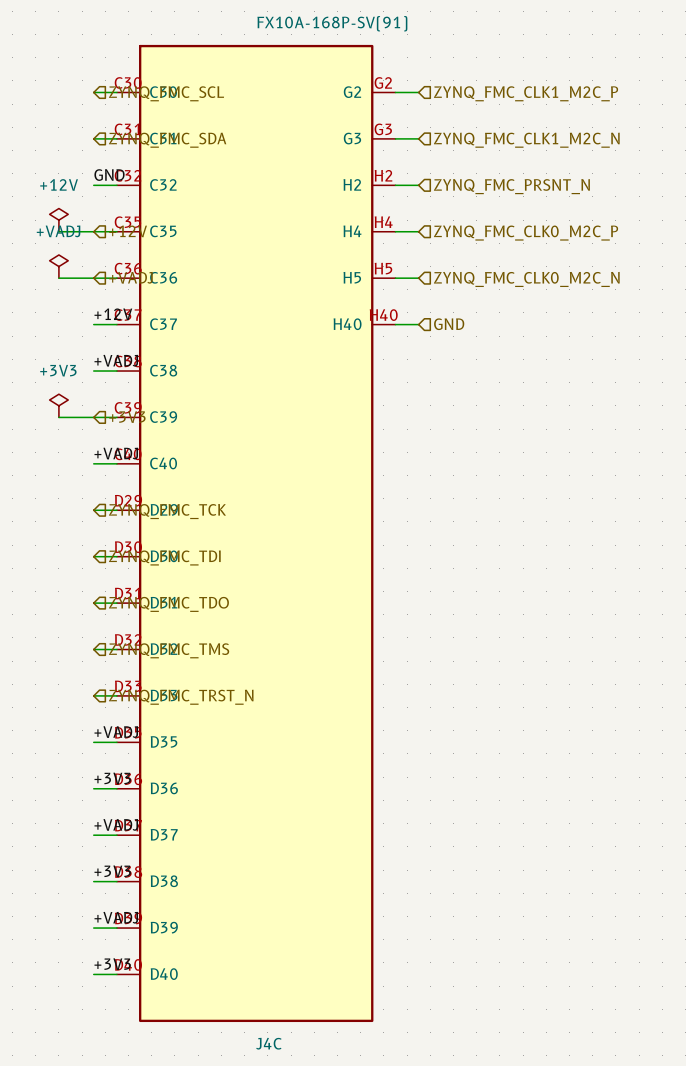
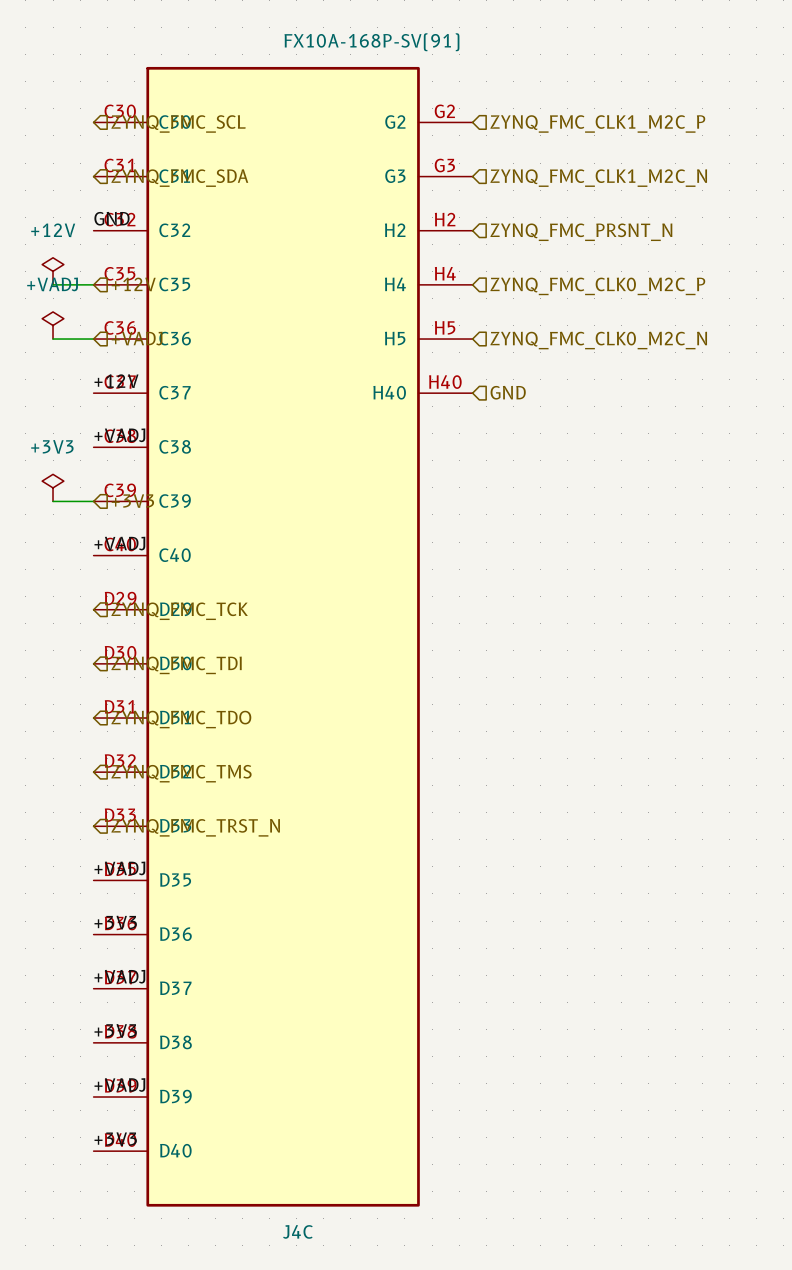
J4C symbol: [116, 44, 396, 1023] -> [93, 66, 473, 1207]

